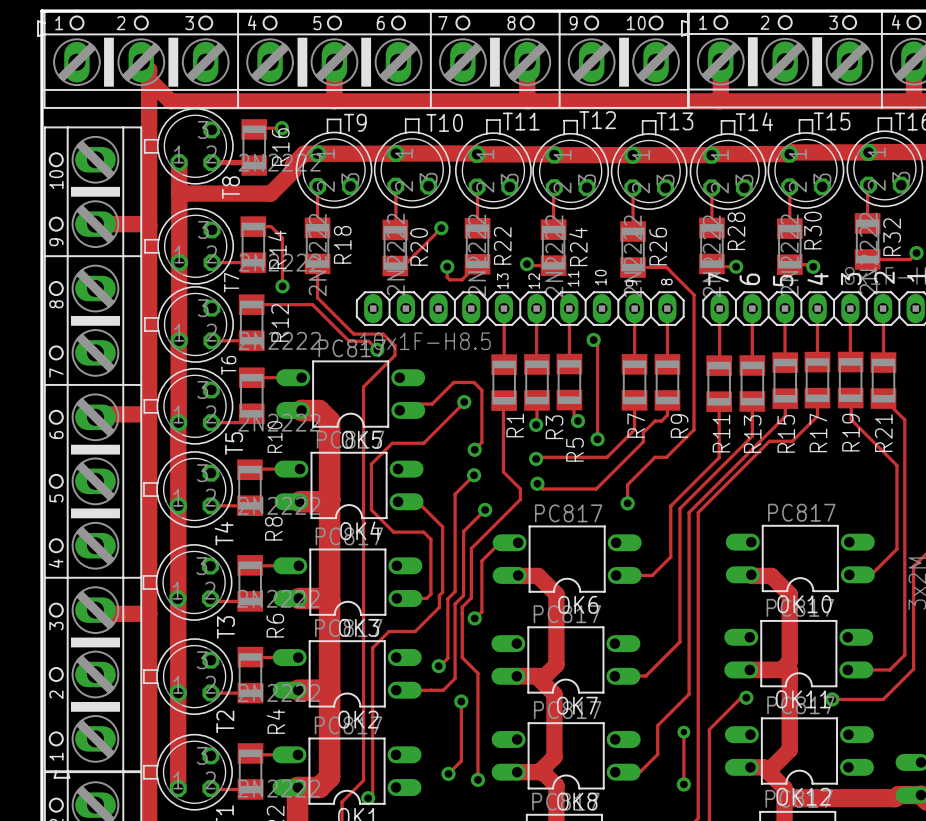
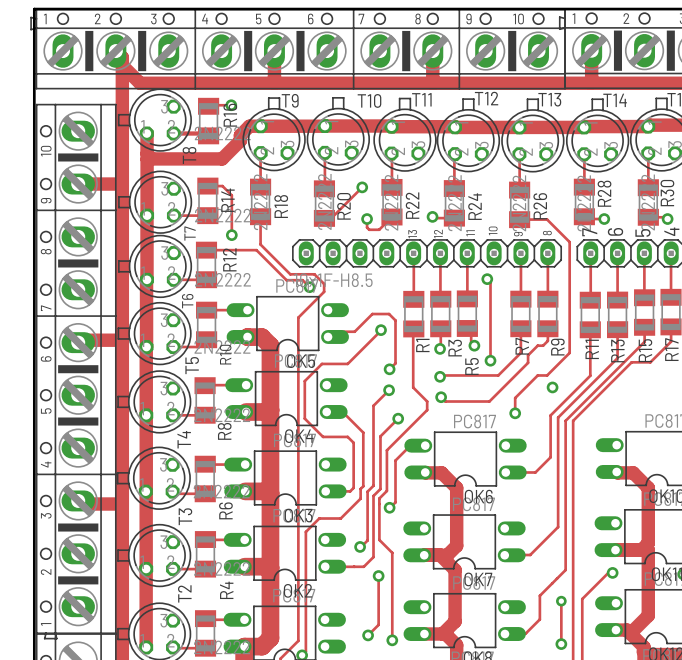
via: none -> (552, 387)

